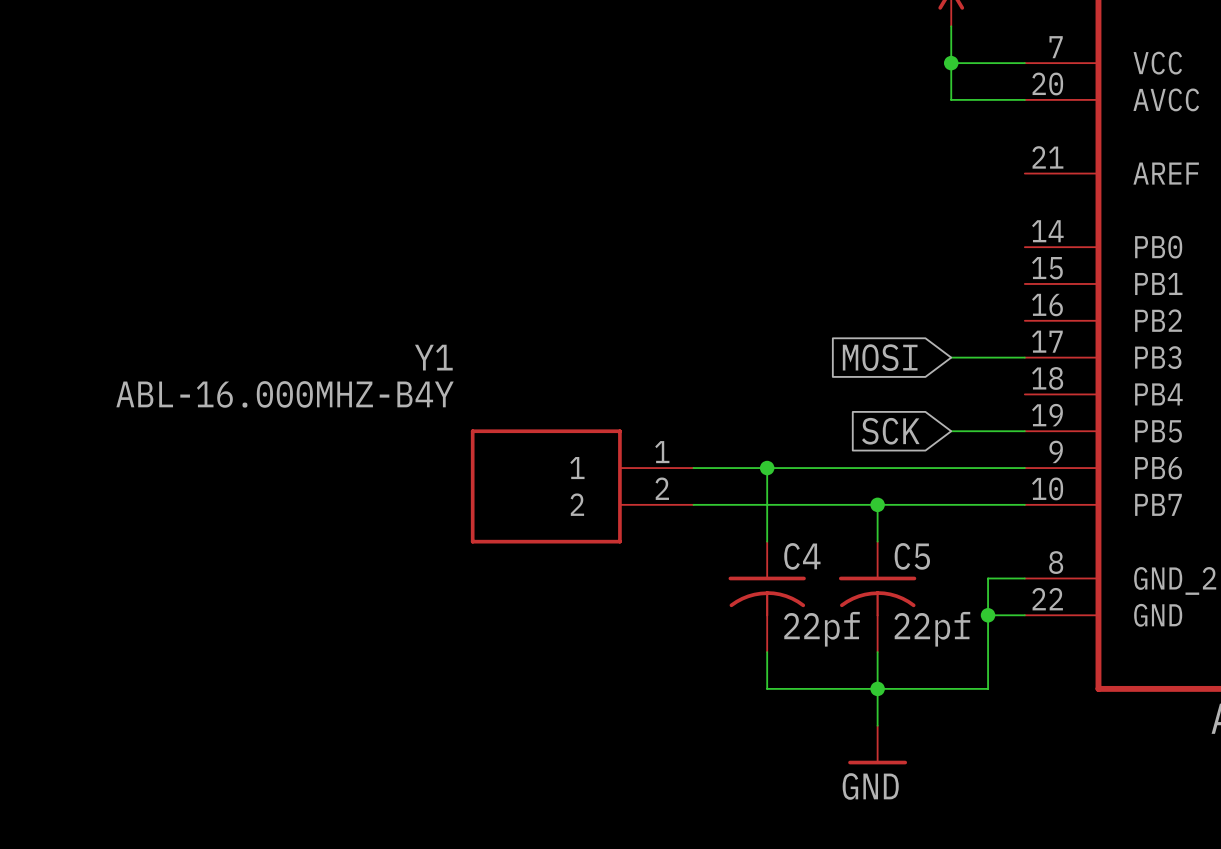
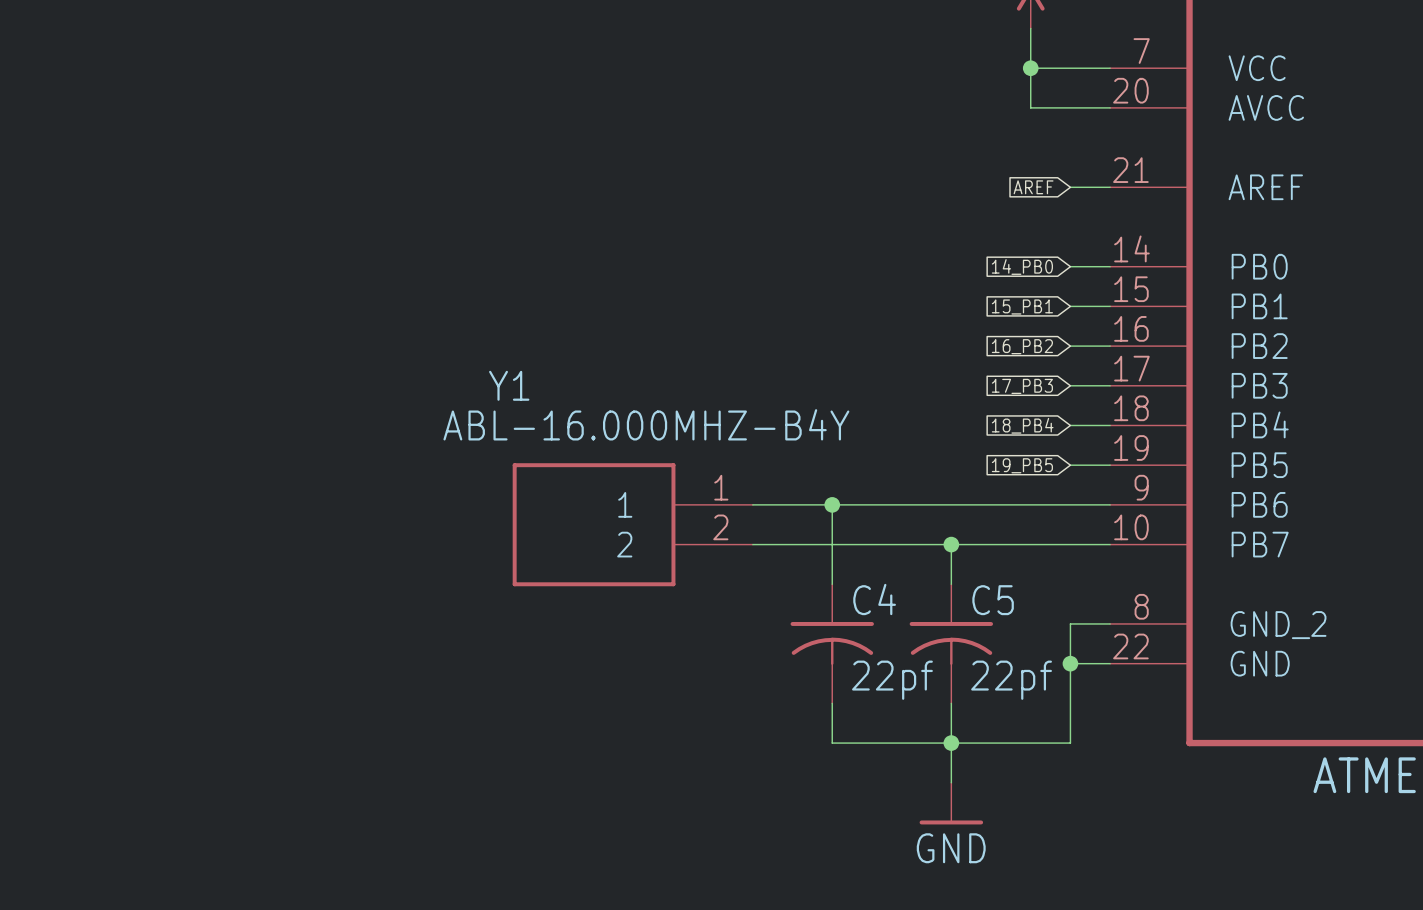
global label: none -> AREF (1033, 187)
wire: none -> (1070, 187) (1110, 187)
wire: none -> (1070, 266) (1110, 266)
global label: none -> 14_PB0 (1022, 267)
wire: none -> (1070, 306) (1110, 306)
global label: none -> 15_PB1 (1022, 307)
global label: none -> 16_PB2 (1022, 346)
Y1 name position: Y1 (433, 357) -> Y1 (509, 385)
global label: MOSI (880, 357) -> none
wire: (951, 357) (988, 357) -> (1070, 346) (1110, 346)
global label: none -> 17_PB3 (1022, 386)
Y1 value position: ABL-16.000MHZ-B4Y (285, 394) -> ABL-16.000MHZ-B4Y (646, 424)
global label: none -> 18_PB4 (1022, 425)
global label: SCK (890, 431) -> none
wire: (951, 431) (988, 431) -> (1070, 425) (1110, 425)
global label: none -> 19_PB5 (1022, 465)

